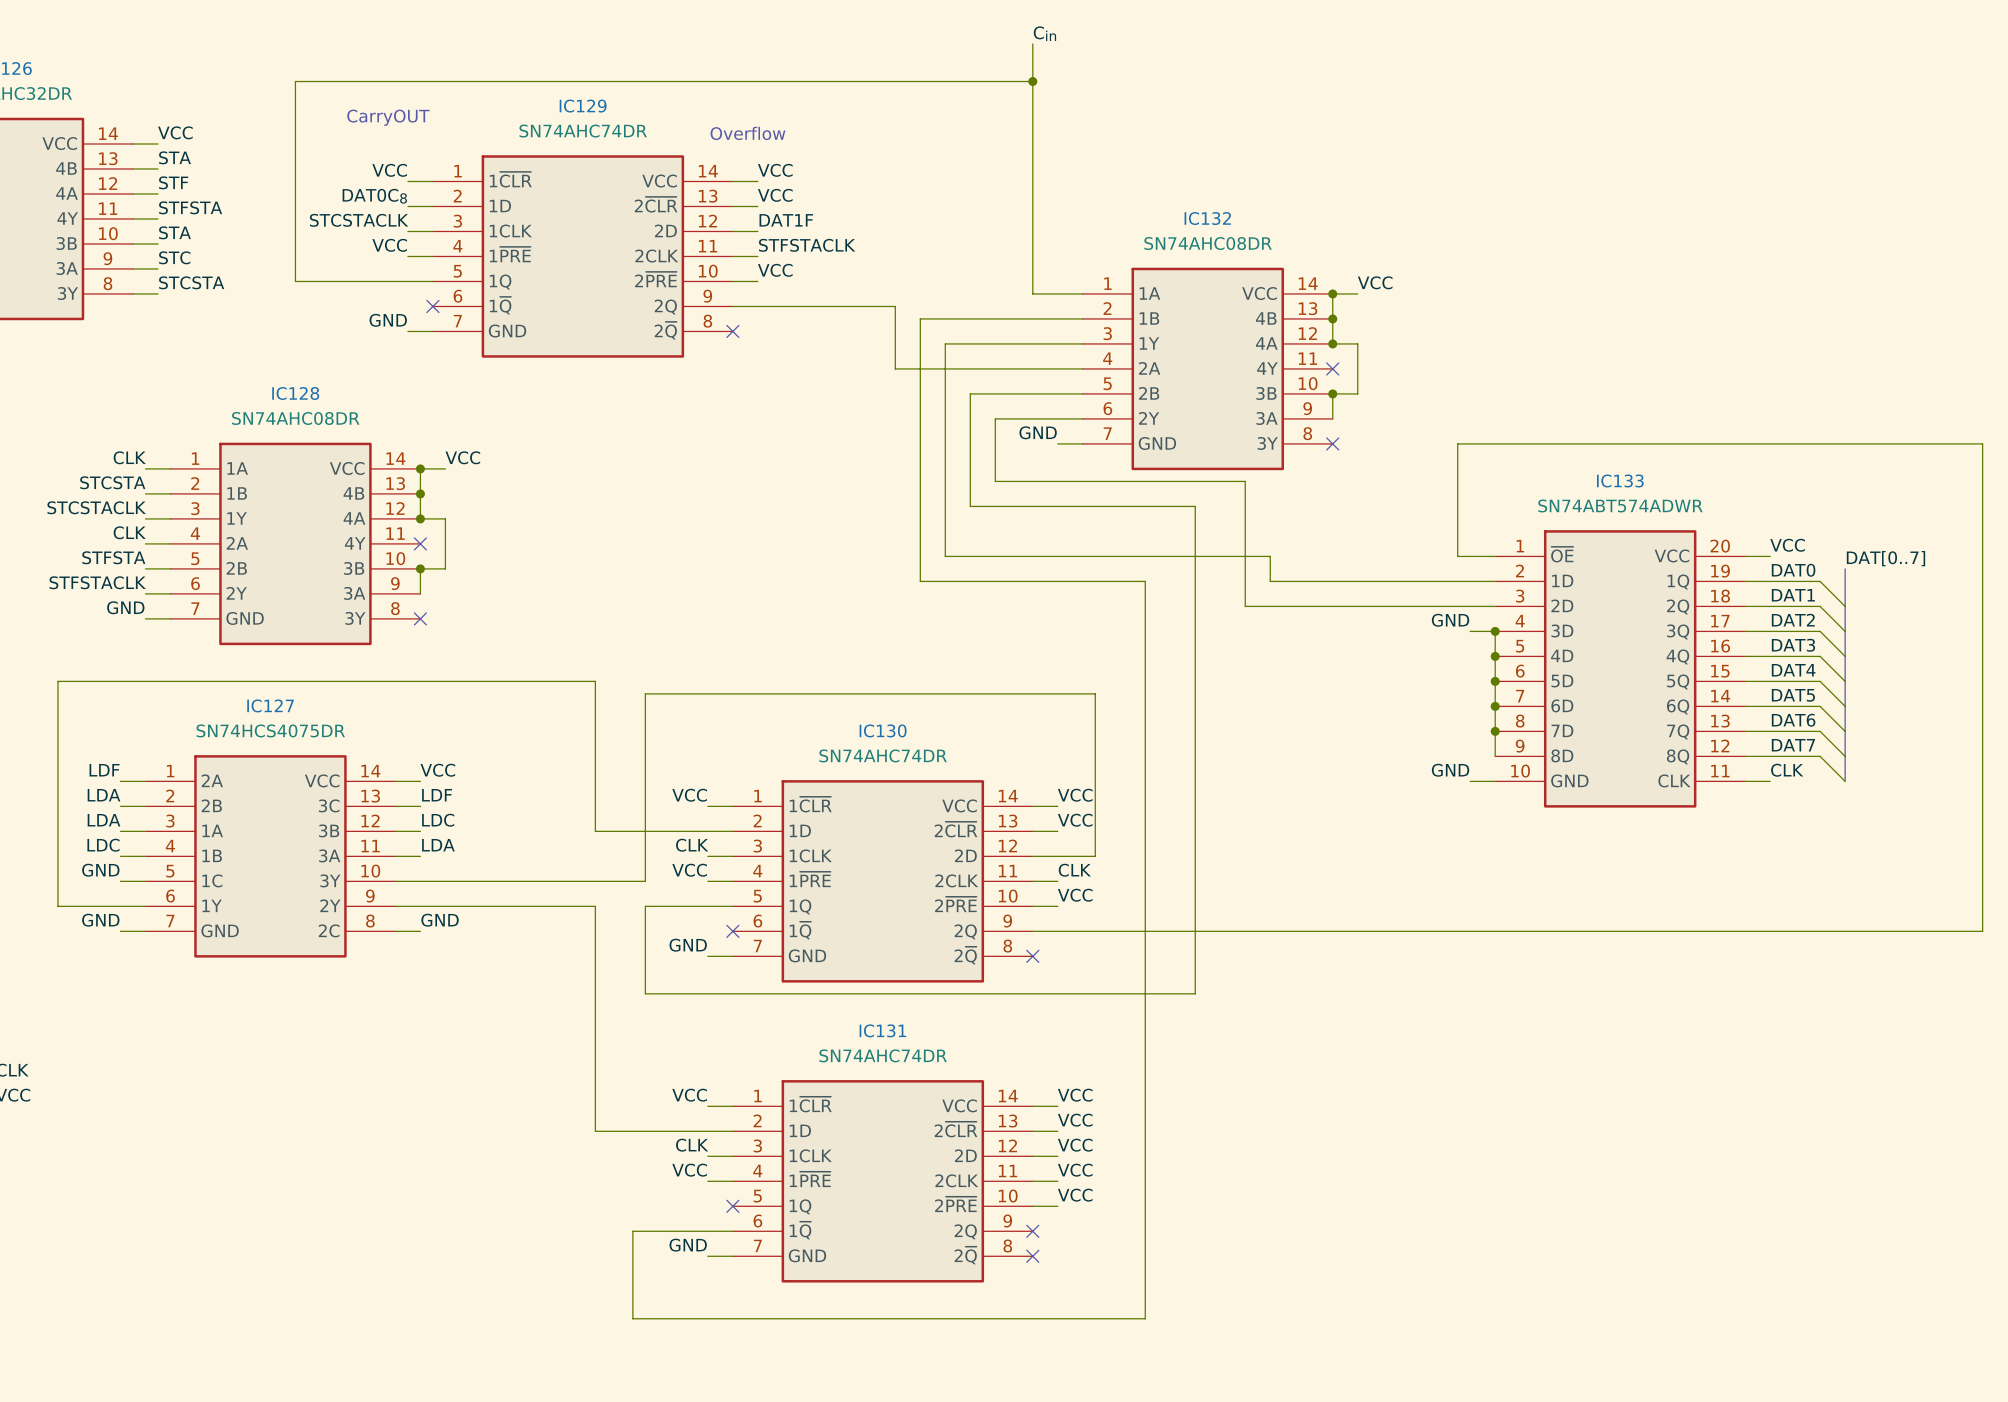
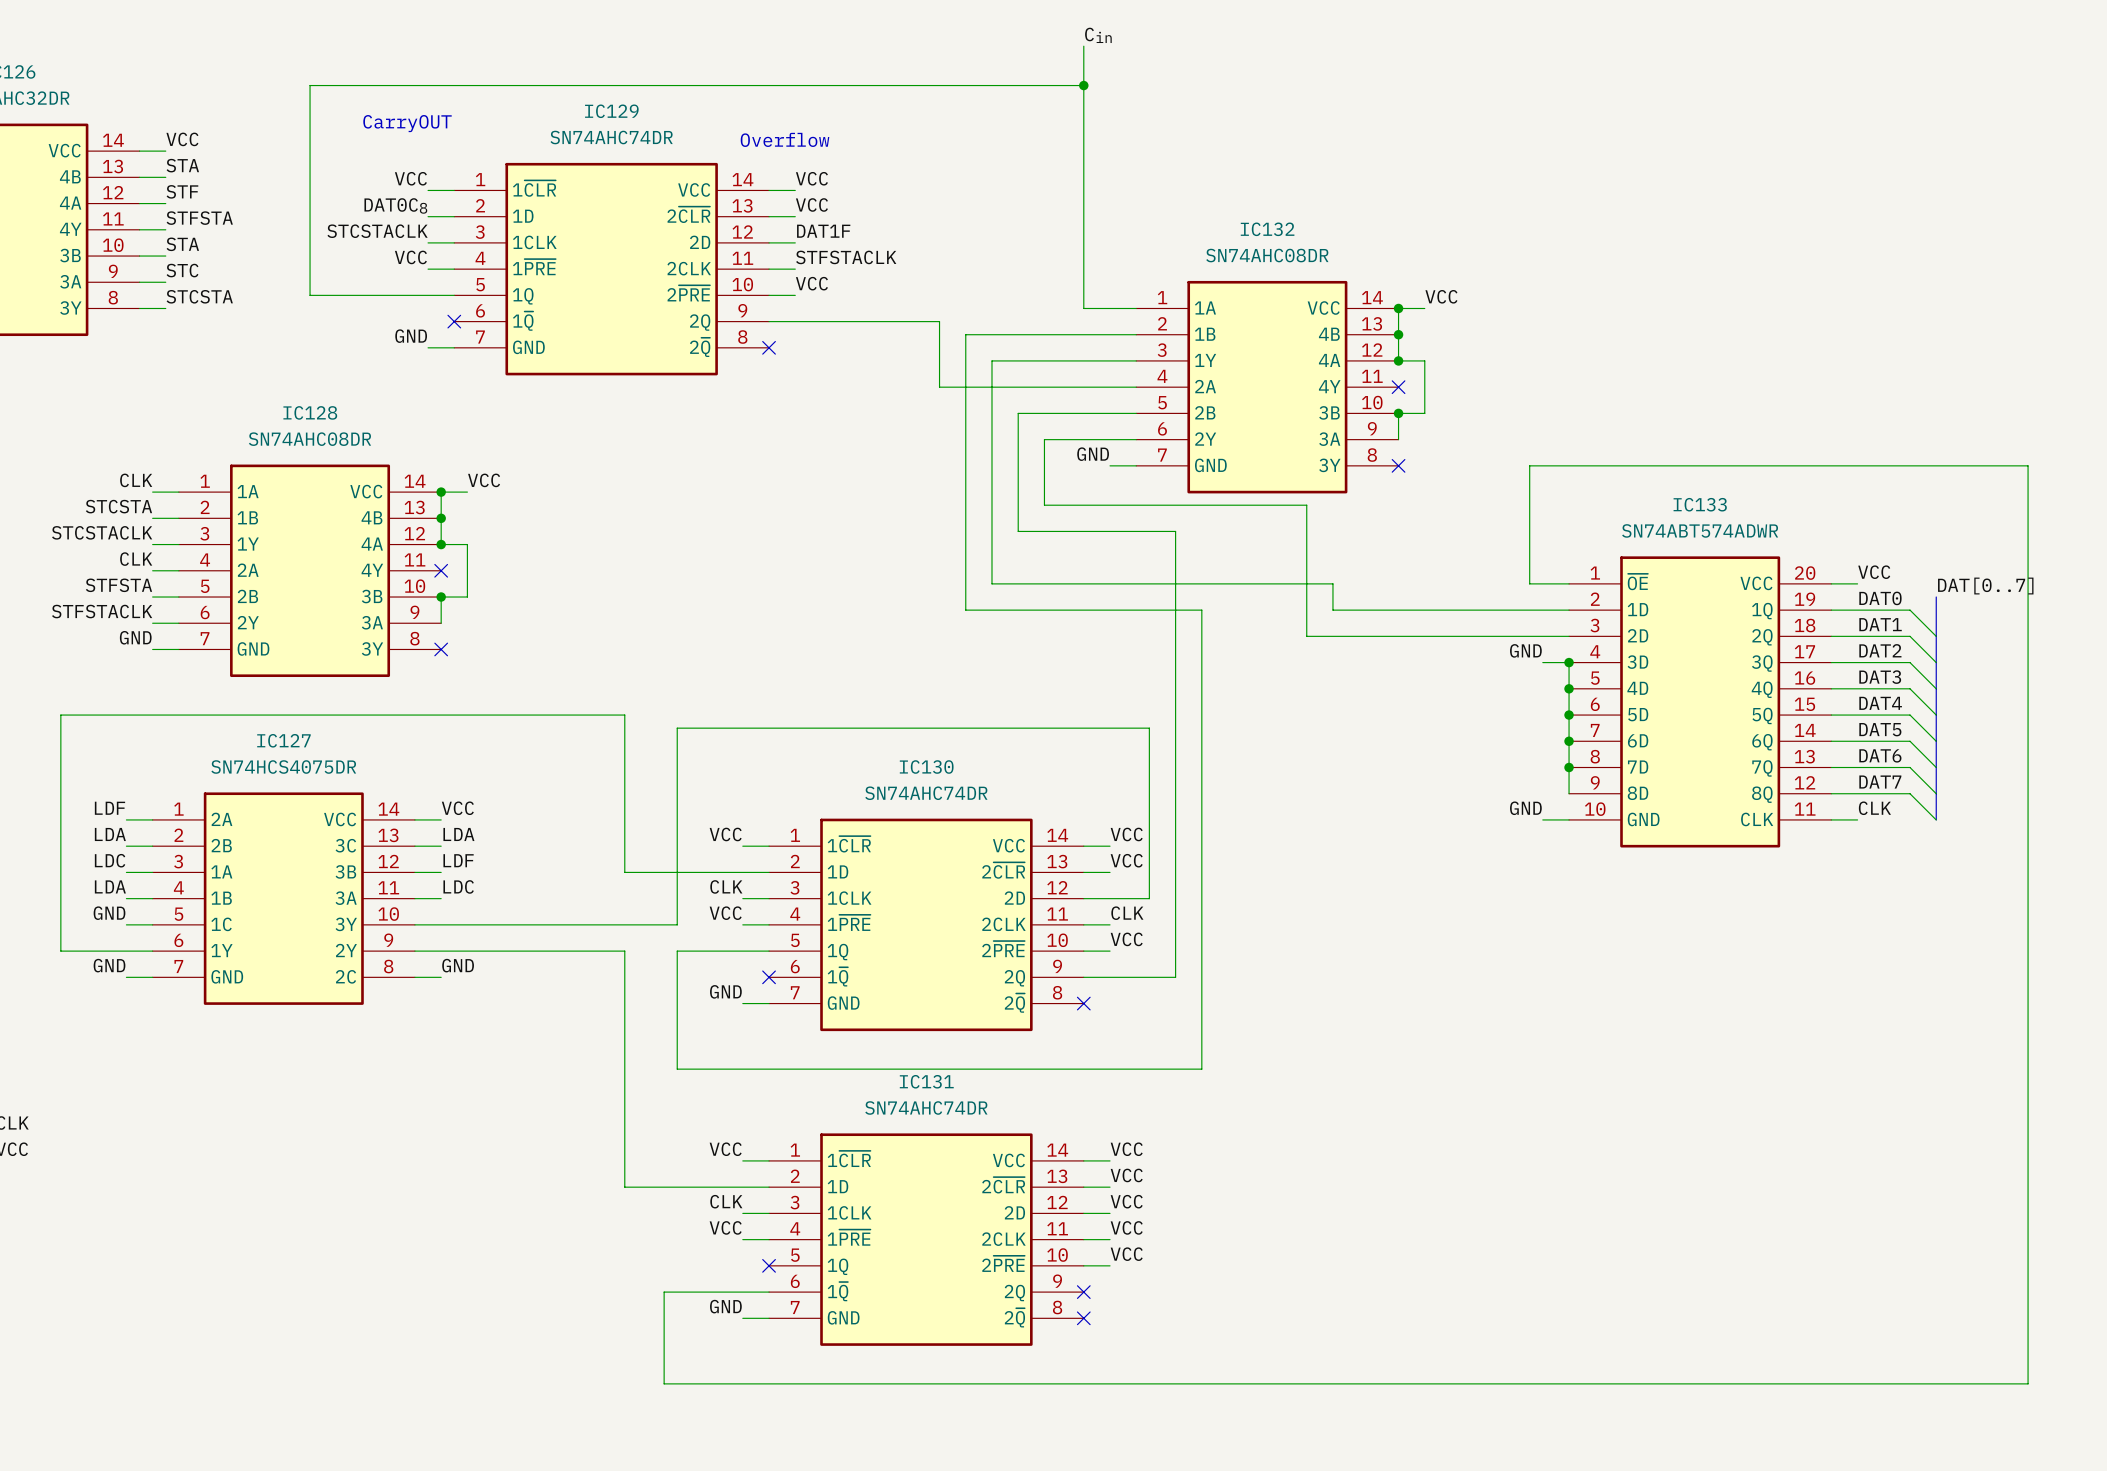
wire: (1932, 443) (1982, 443) (1982, 931) (1120, 931) -> (2028, 465) (2028, 1383) (1201, 1383)
wire: (1120, 506) (1195, 506) (1195, 993) (645, 993) -> (1175, 531) (1175, 977)
label: LDF (437, 795) -> LDA (458, 834)
label: LDA (104, 820) -> LDC (110, 860)
label: LDC (438, 820) -> LDF (458, 860)
label: LDC (103, 845) -> LDA (110, 886)
label: LDA (438, 845) -> LDC (458, 886)
wire: (1145, 1018) (1145, 1318) -> (1201, 1069) (677, 1069) (677, 1042)

